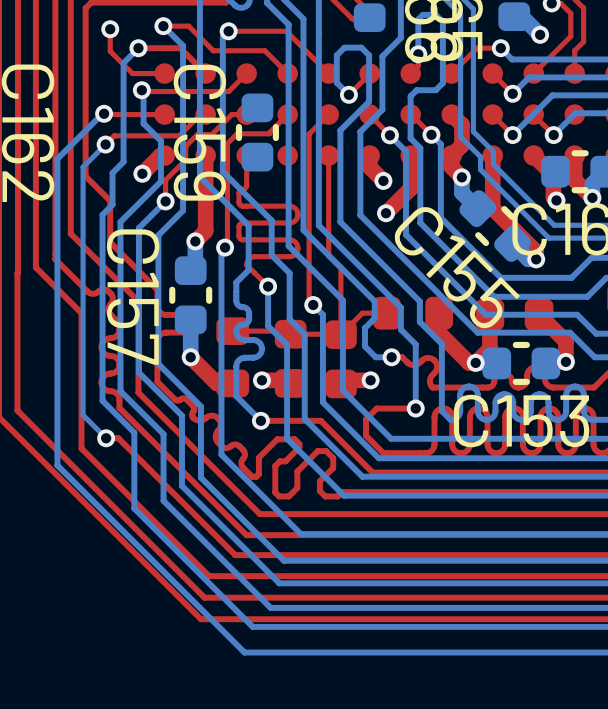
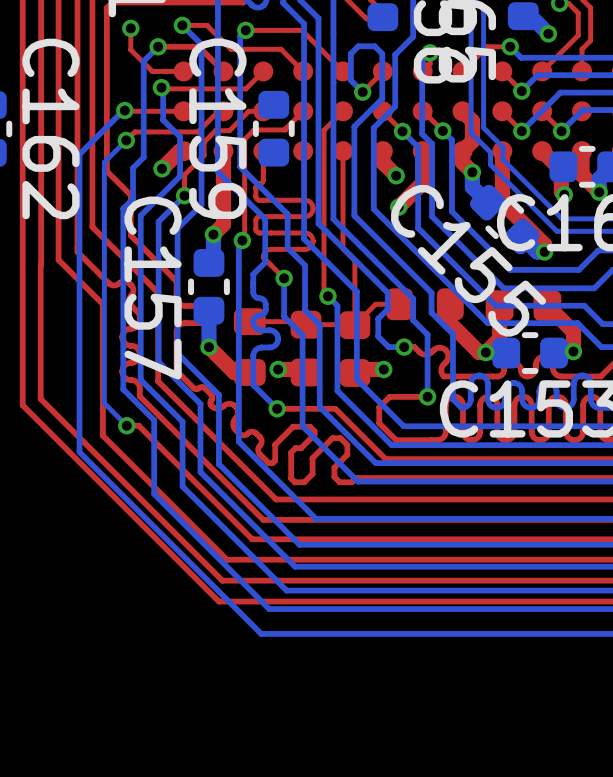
bottom track: (418, 54) (418, 19) (422, 14) (435, 14) (442, 22) (442, 83) (435, 90) (416, 90) (410, 96) (410, 138) -> (430, 52) (422, 60) (422, 134)

